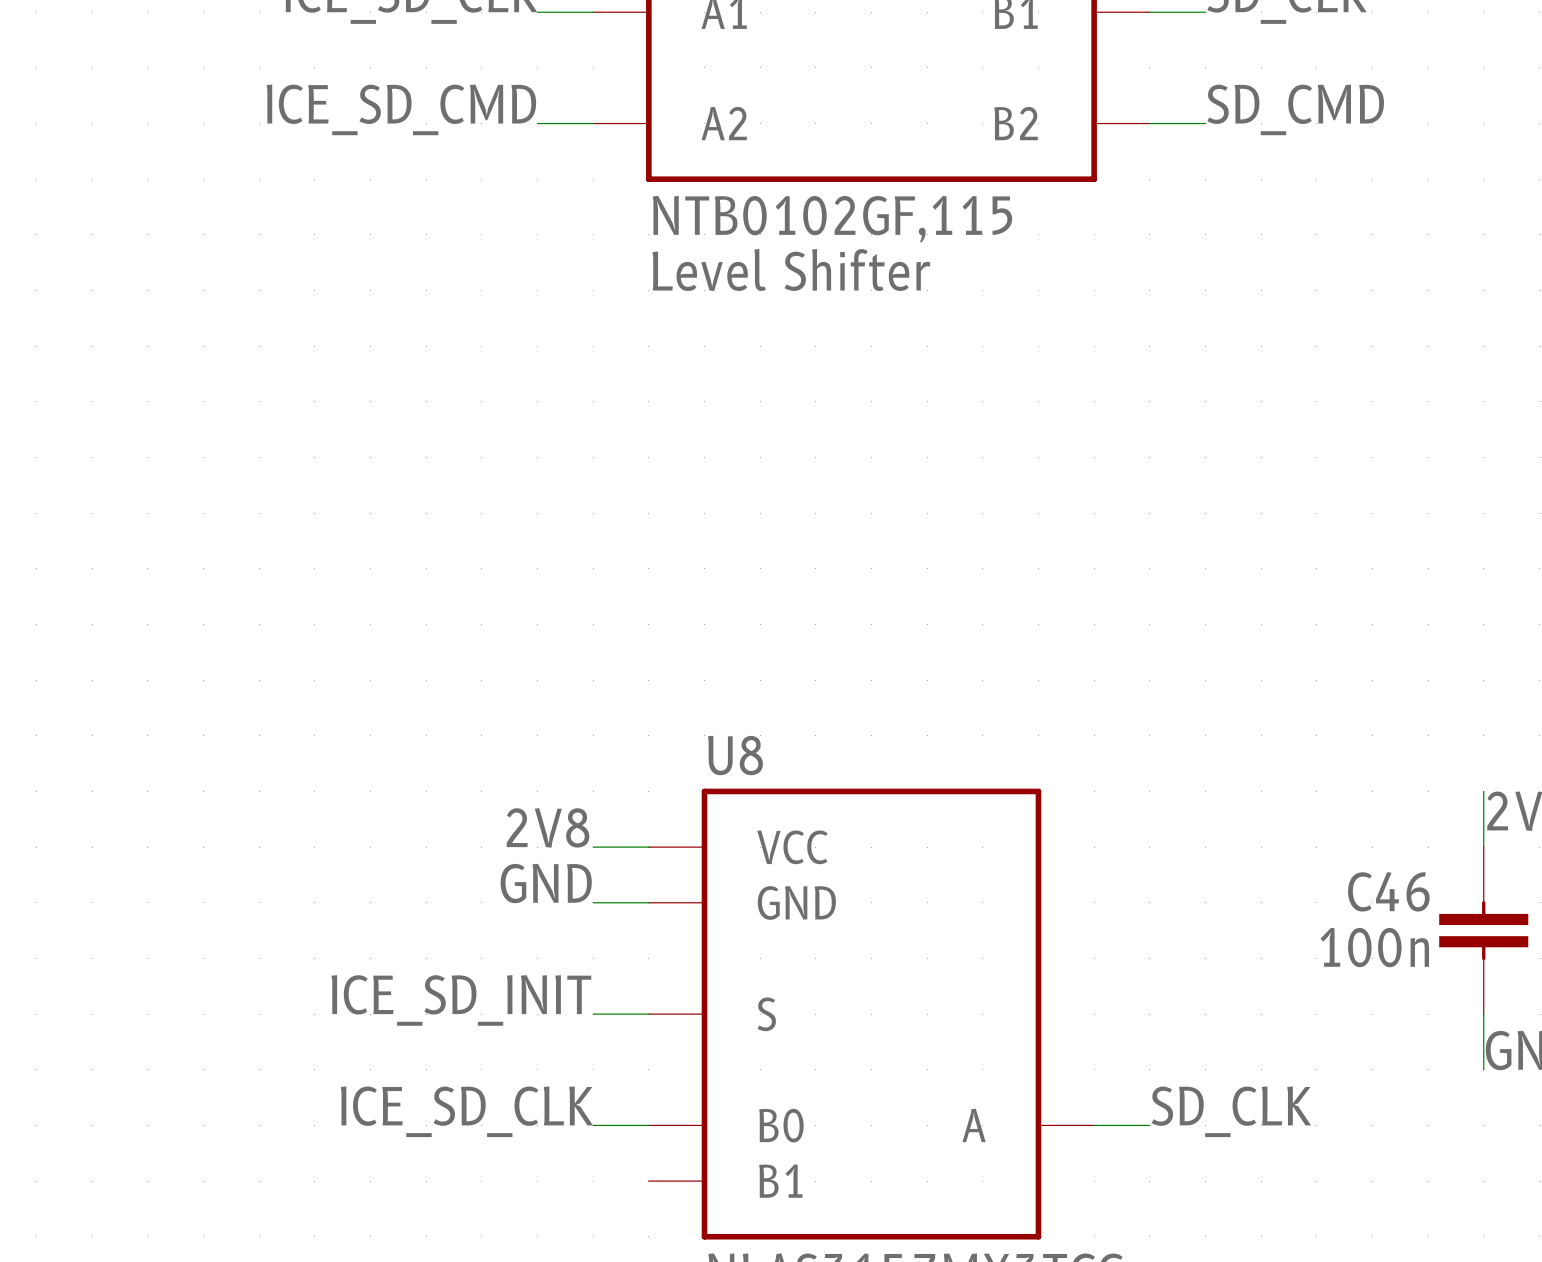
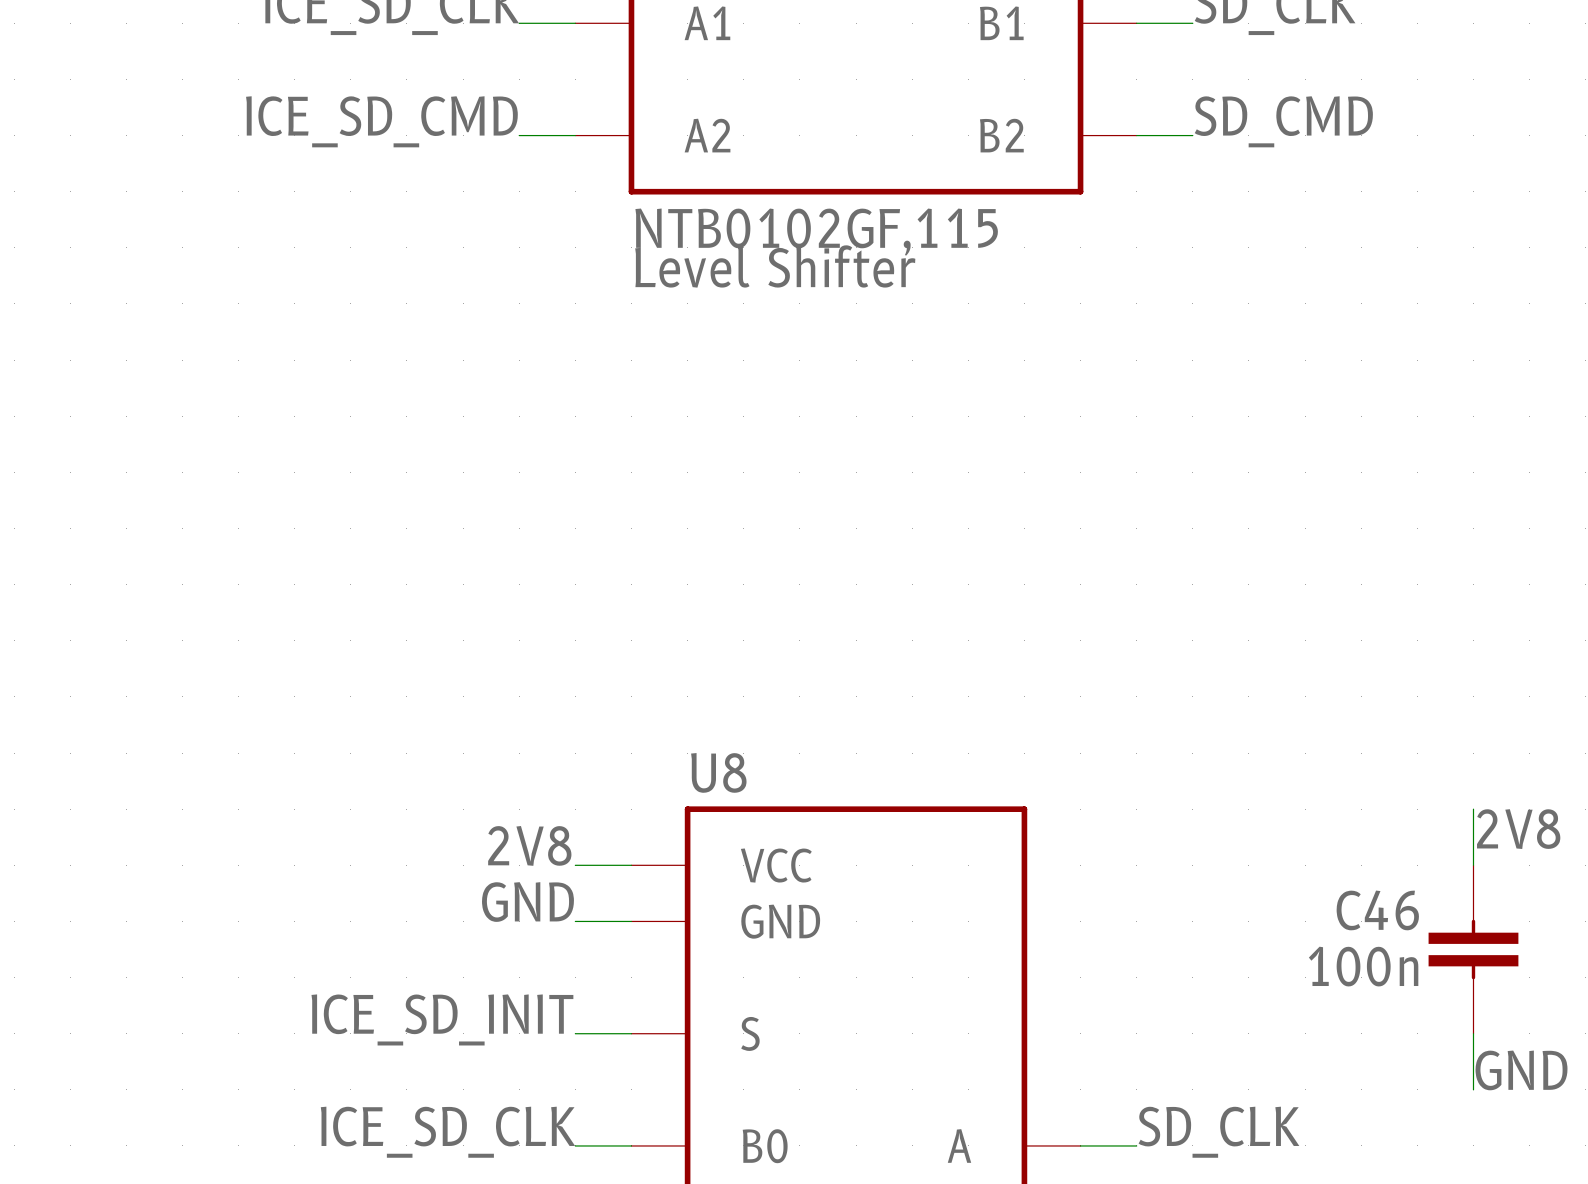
part text position: Level Shifter (791, 270) -> Level Shifter (775, 266)

